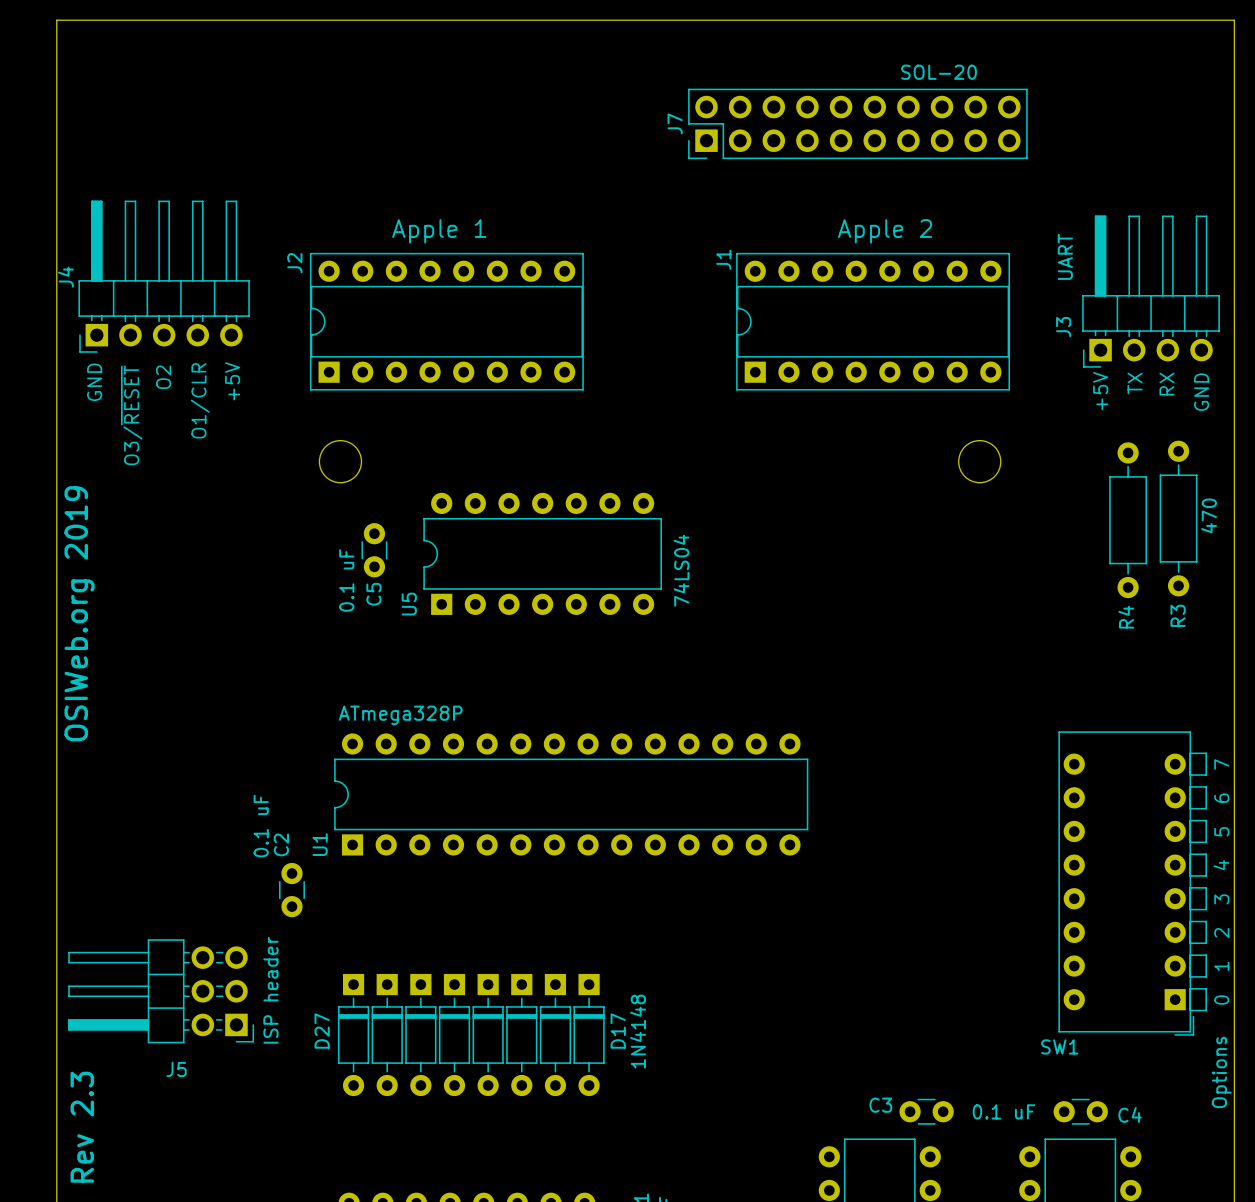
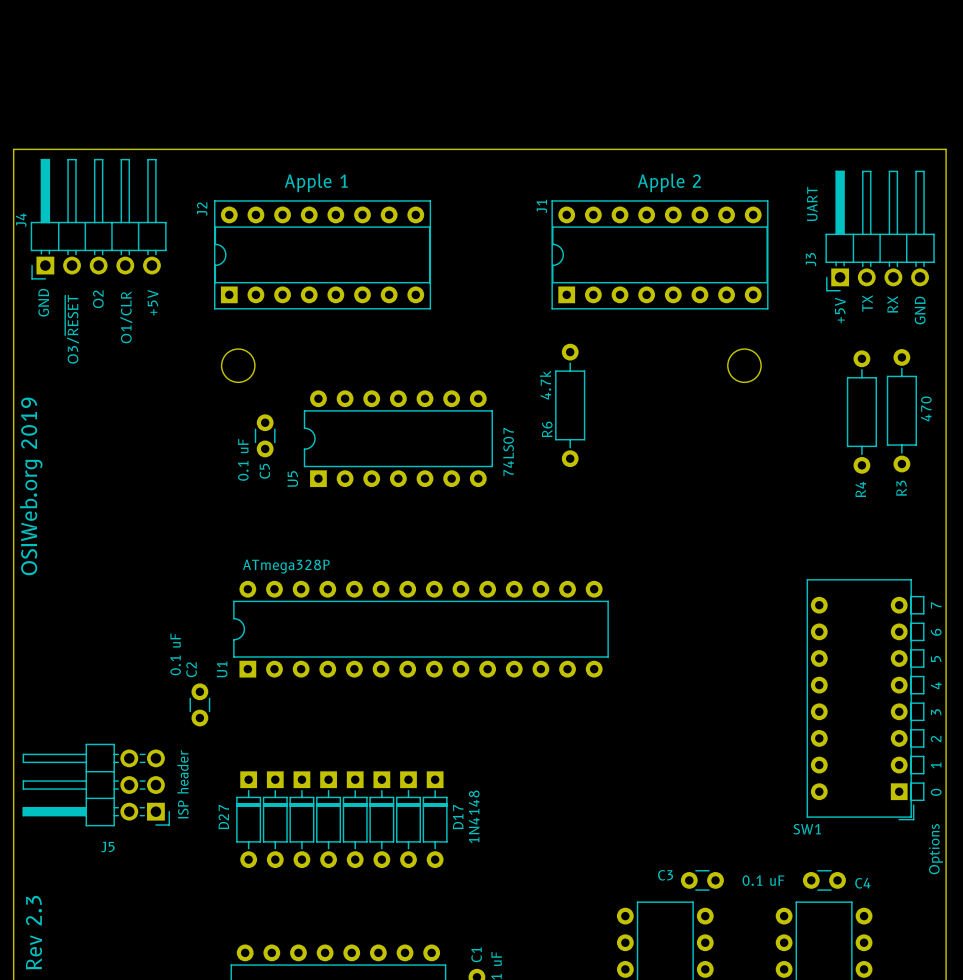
J7: SOL-20 (857, 123) -> none
board edge: (56, 188) (56, 20) (1234, 20) (1234, 188) -> (13, 149) (946, 149)
R6: none -> 4.7k (570, 405)
U5 value: 74LS04 (681, 570) -> 74LS07 (508, 452)

